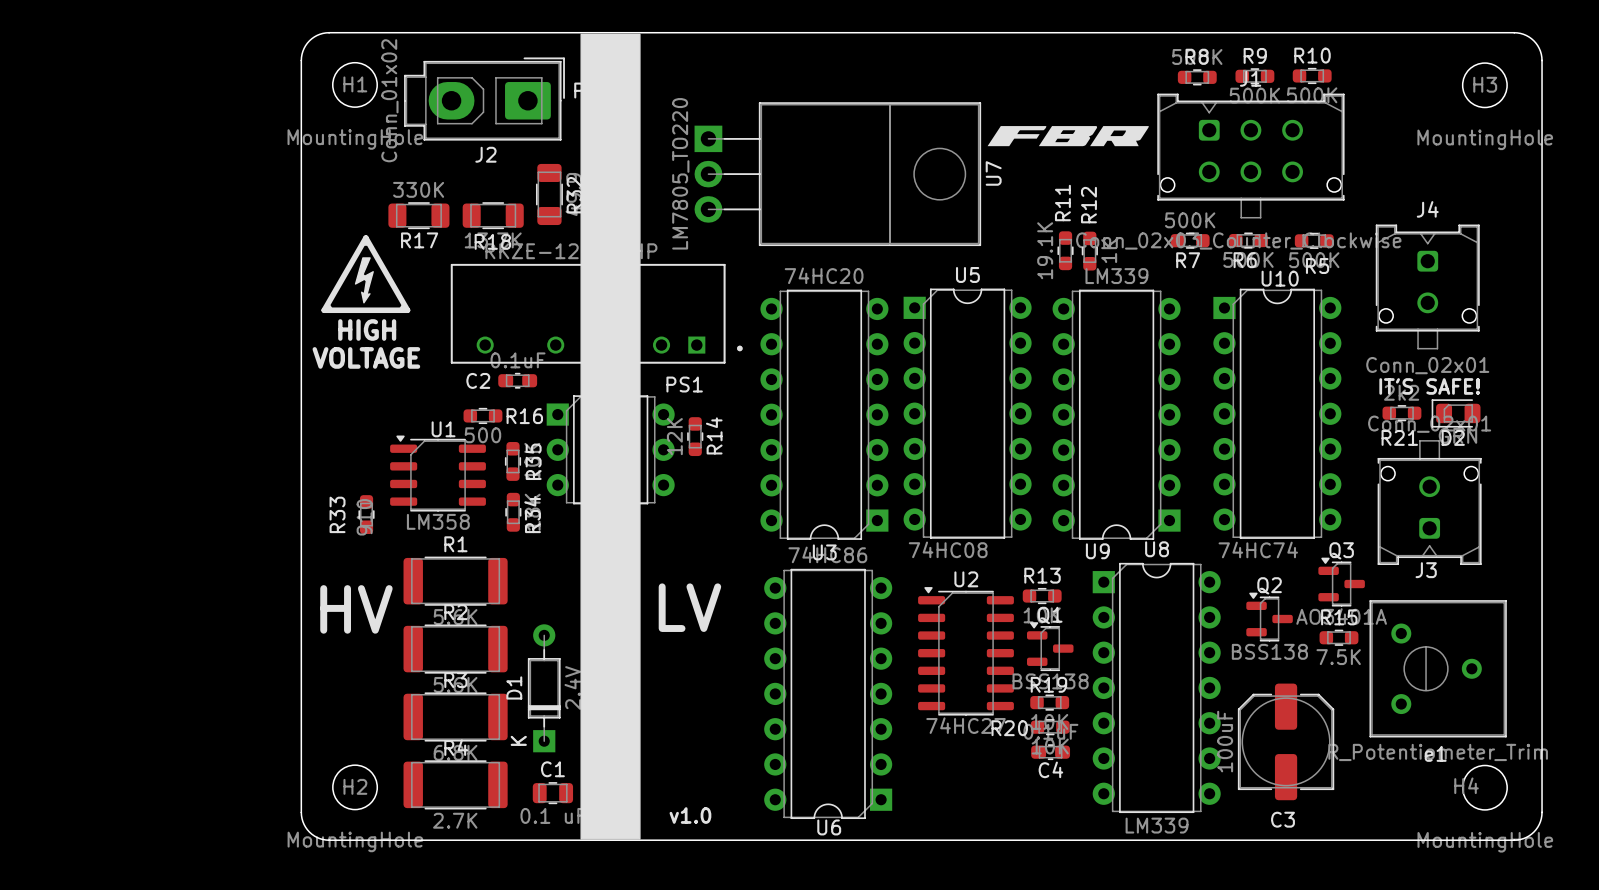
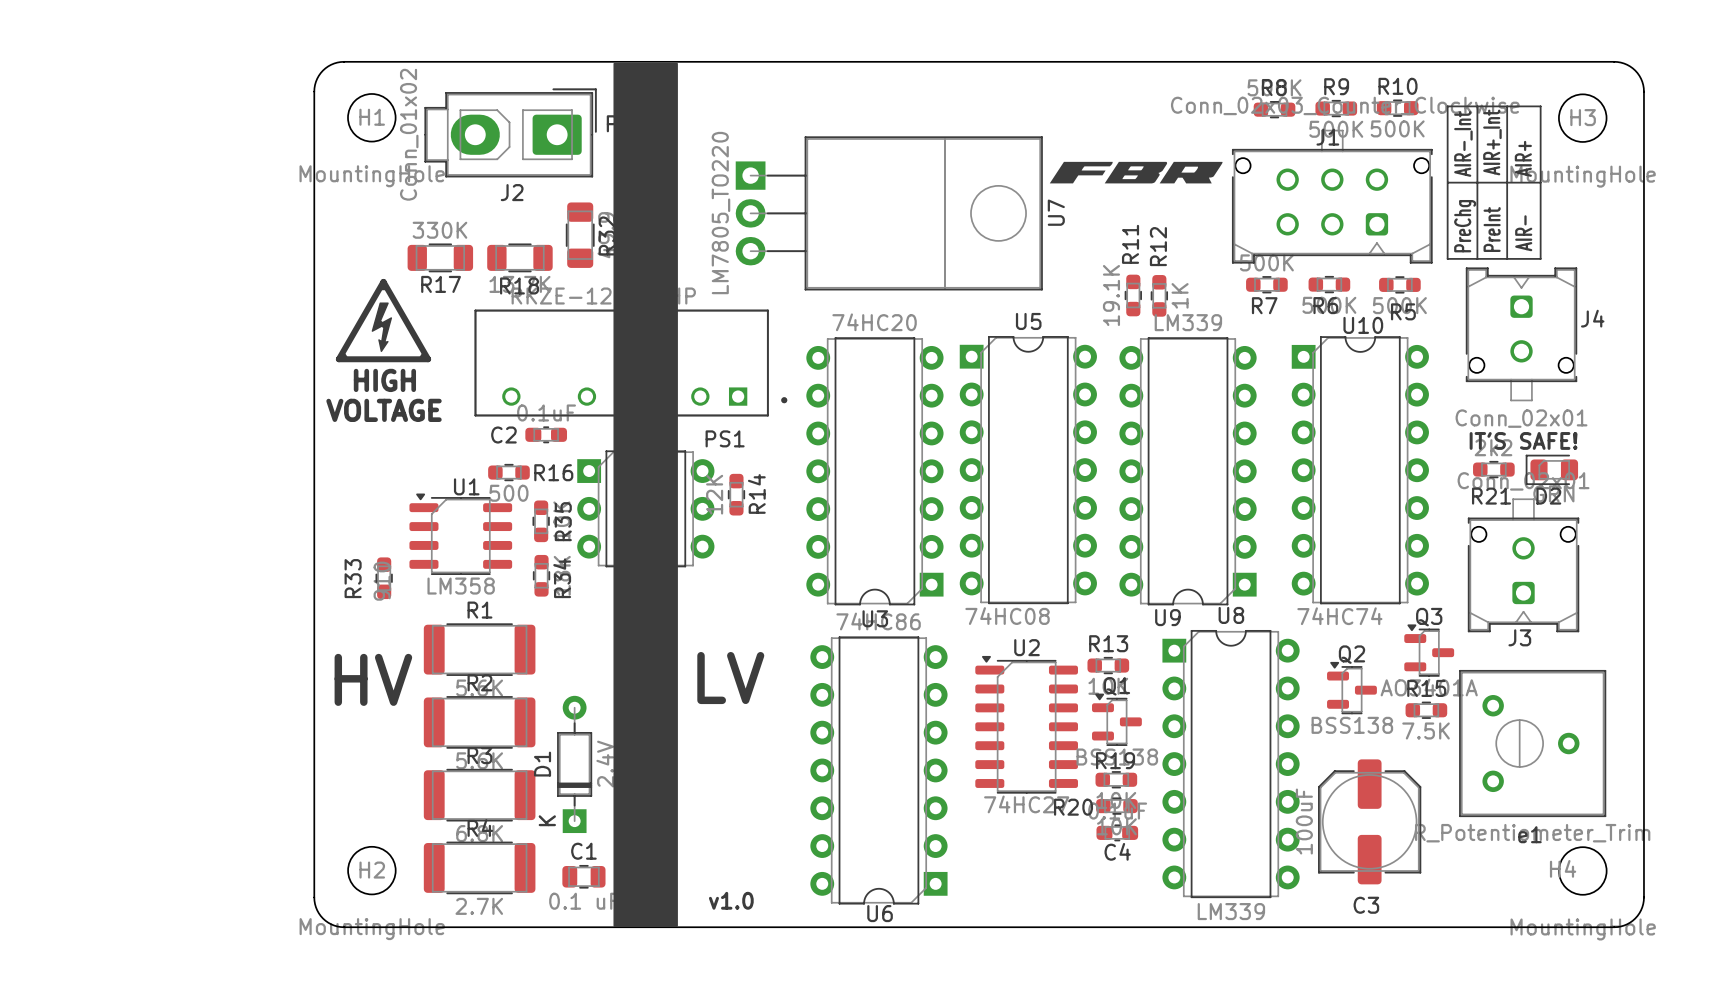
line: none -> (1447, 106) (1540, 106) (1540, 258) (1447, 258) (1447, 106)
line: none -> (1477, 106) (1477, 258)
line: none -> (1507, 106) (1507, 258)
text: none -> AIR+_Int (1492, 142)
text: none -> AIR-_Int (1463, 143)
text: none -> AIR+ (1523, 158)
line: none -> (1448, 182) (1540, 182)
J1 rotation: 0° (1250, 156) -> 180° (1332, 196)
text: none -> PreChg (1465, 226)
text: none -> PreInt (1492, 229)
text: none -> AIR- (1523, 233)
J4 name position: J4 (1427, 209) -> J4 (1592, 318)

